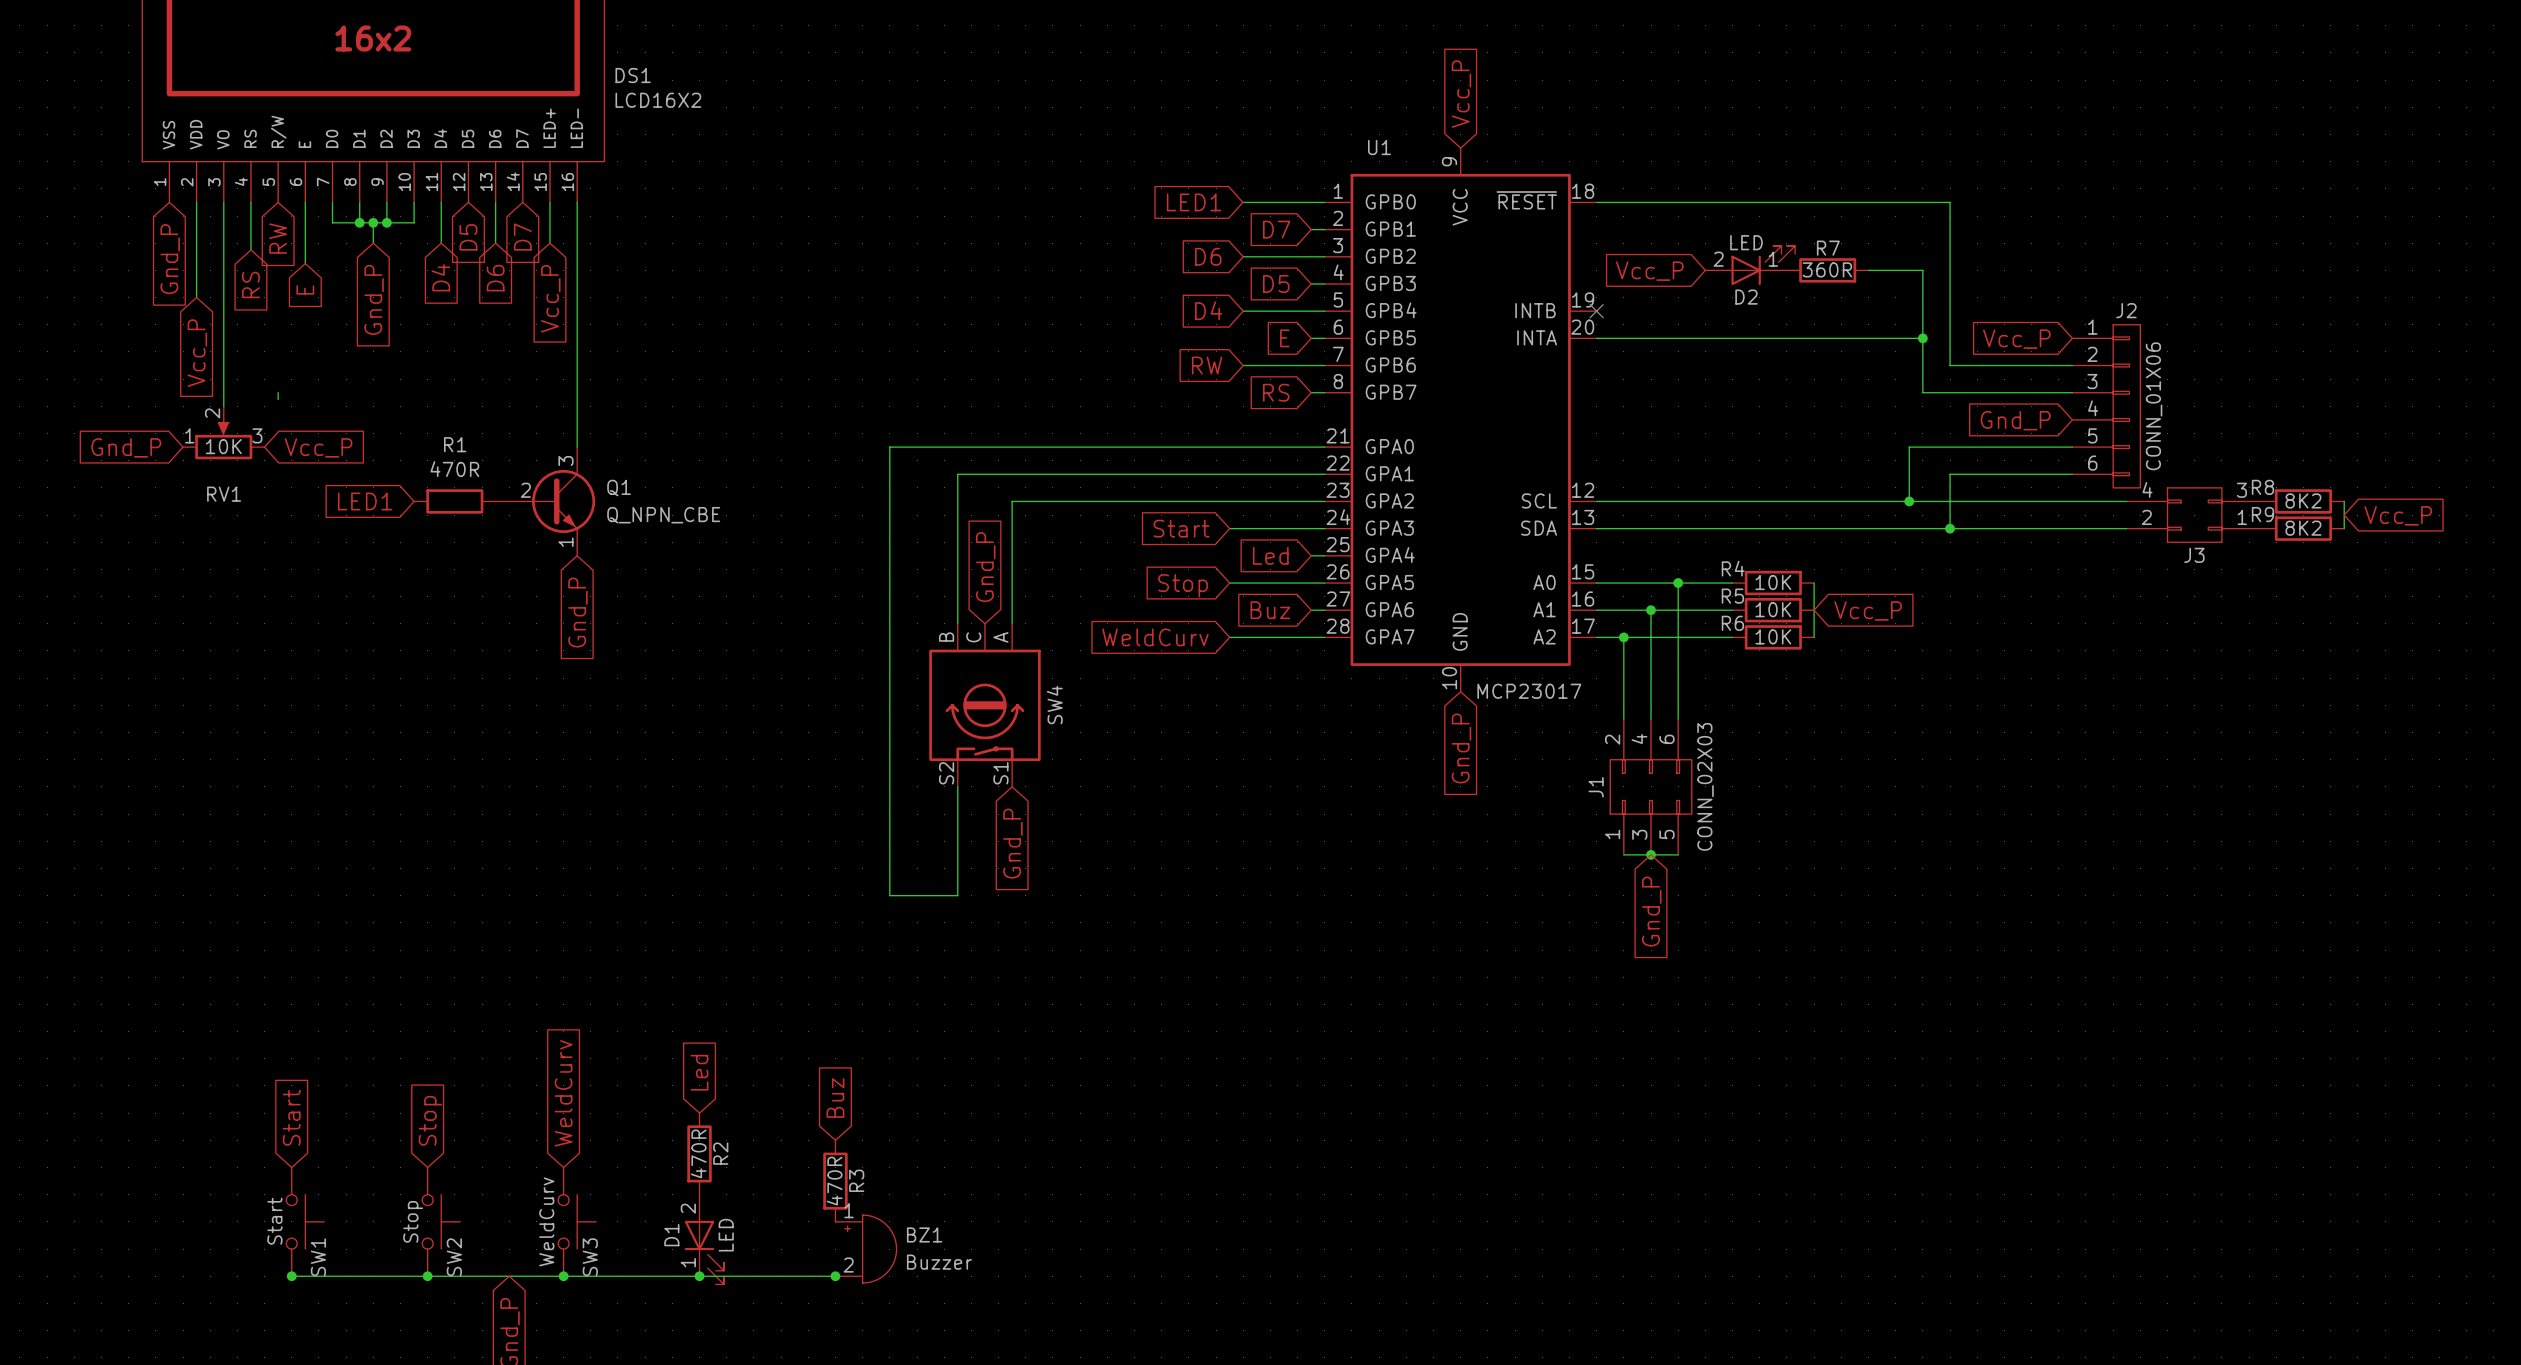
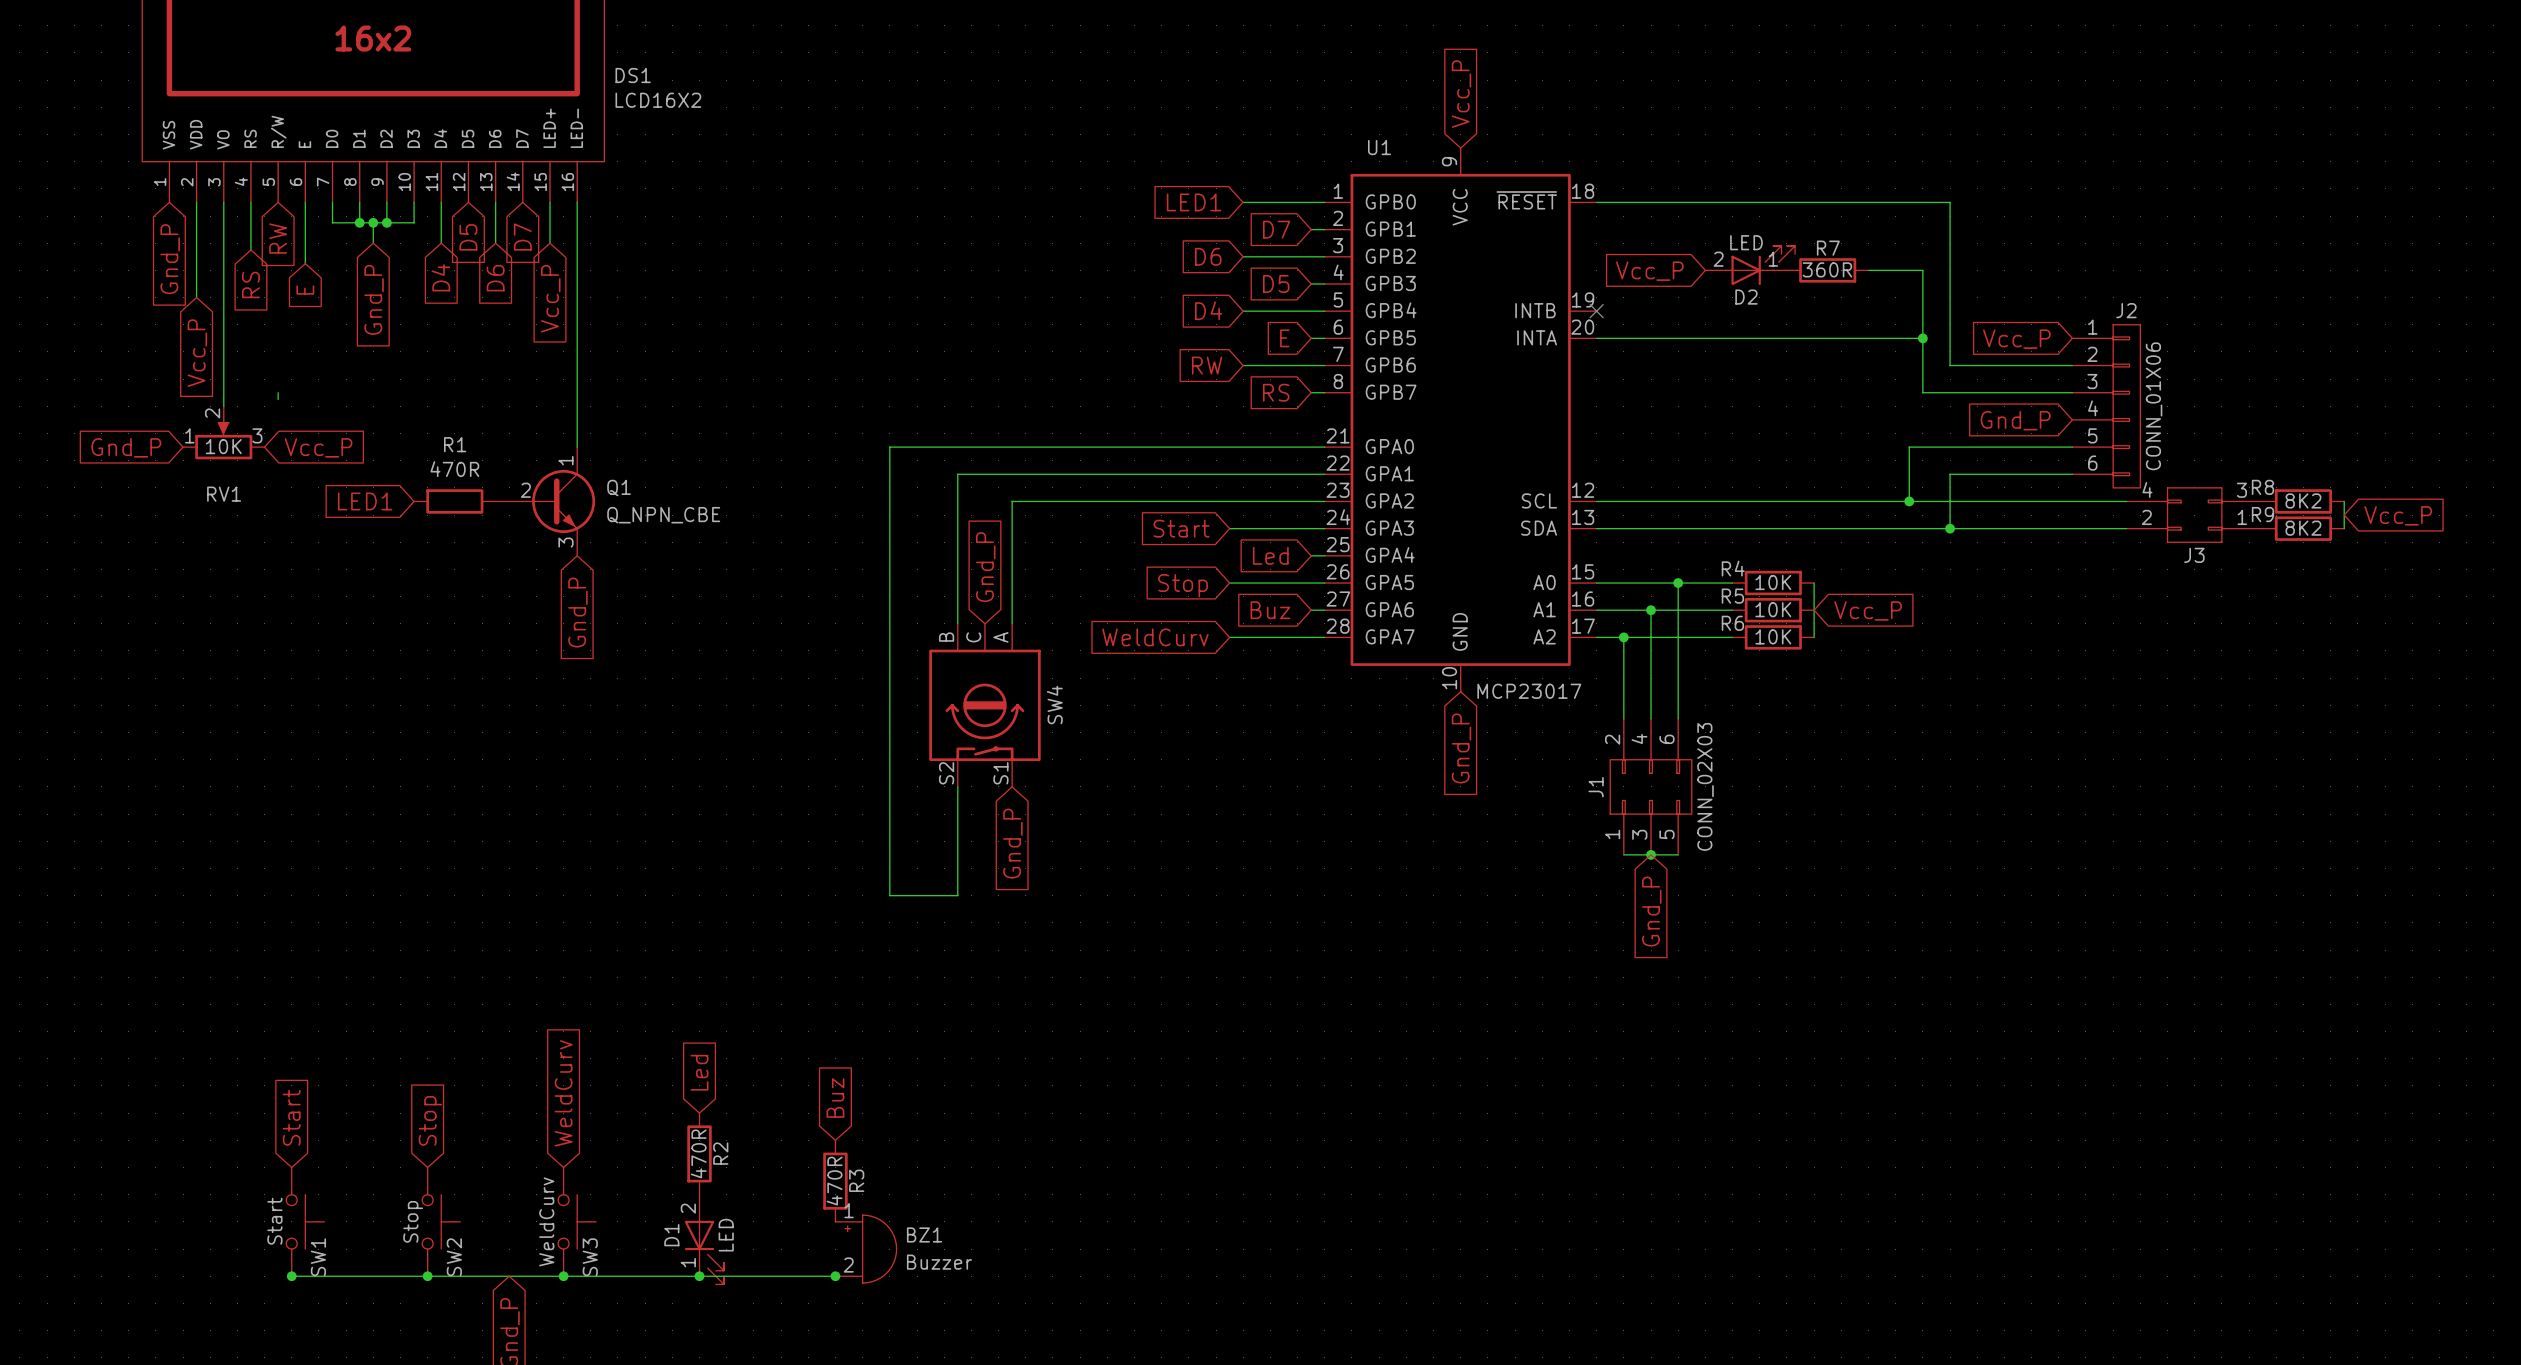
Q1 pin number: 3 (565, 461) -> 1 (565, 460)
Q1 pin number: 1 (565, 542) -> 3 (565, 542)

